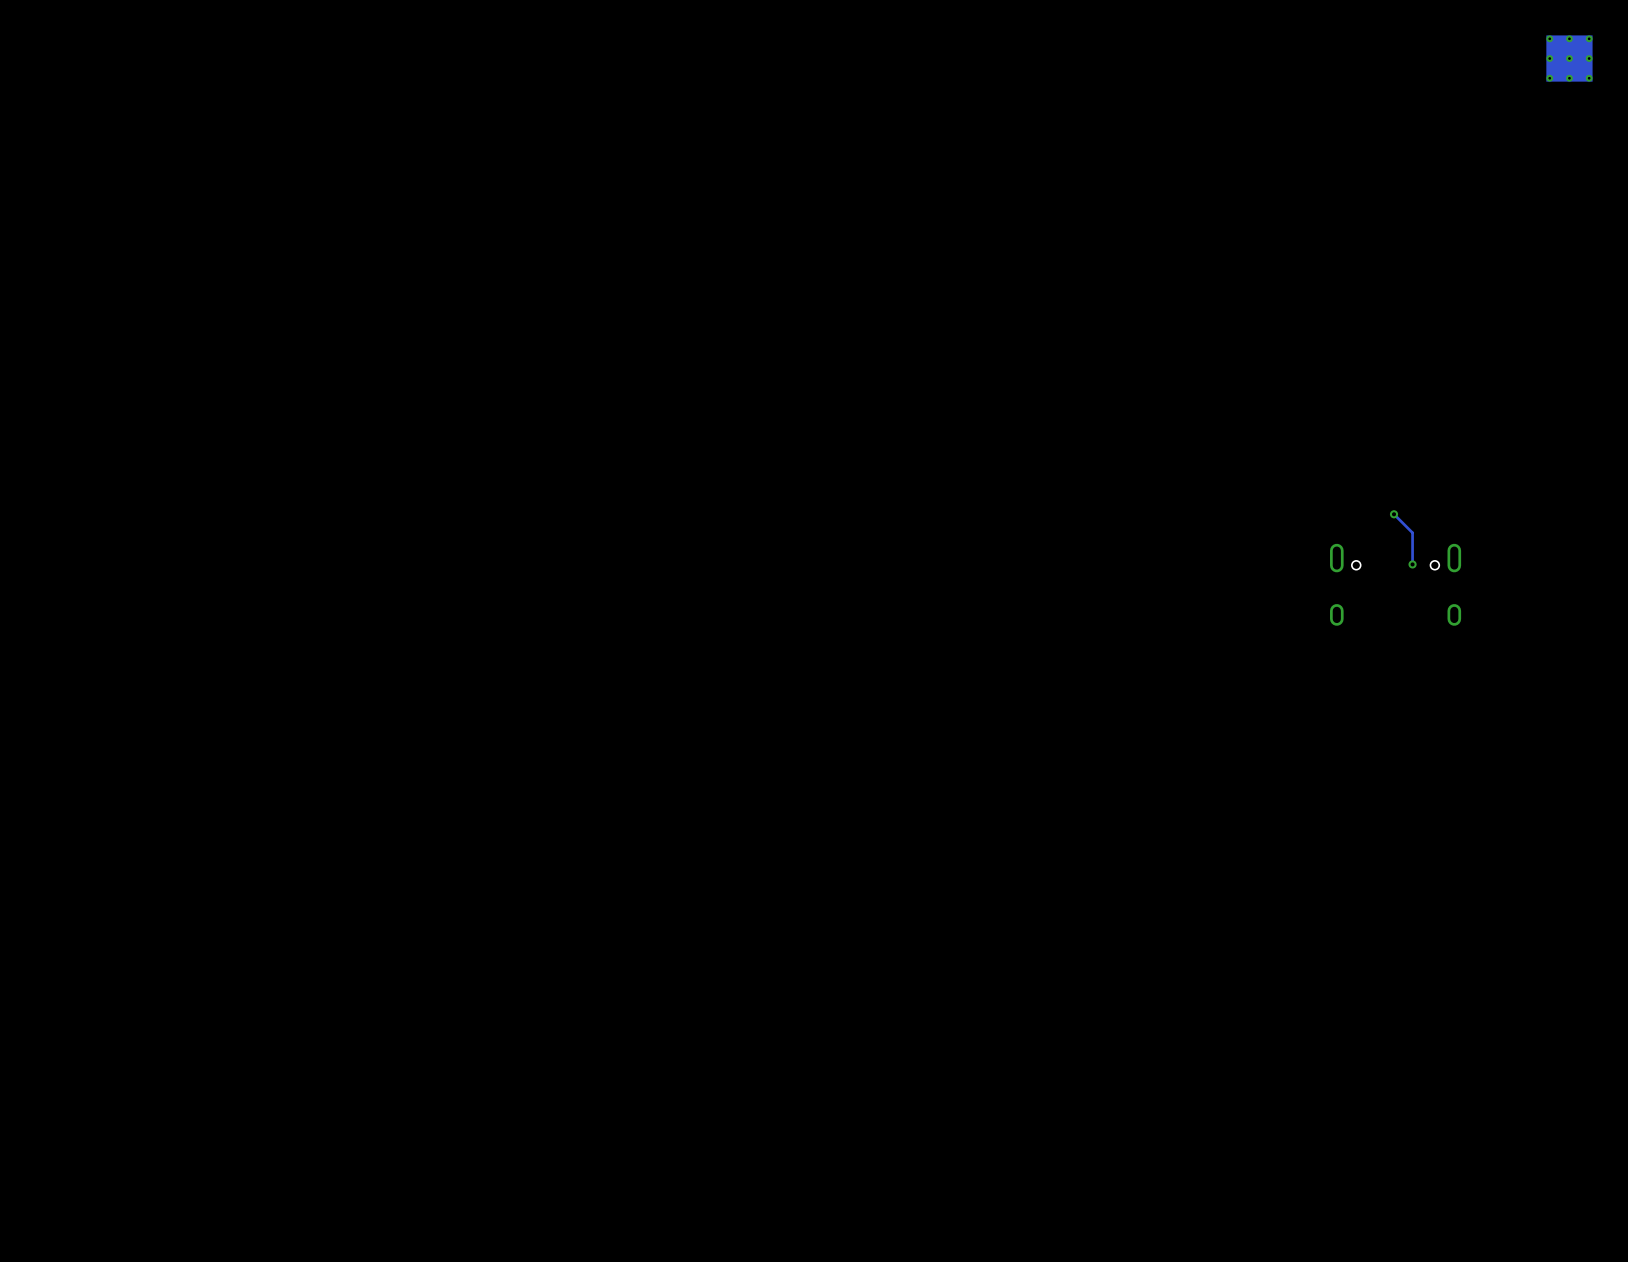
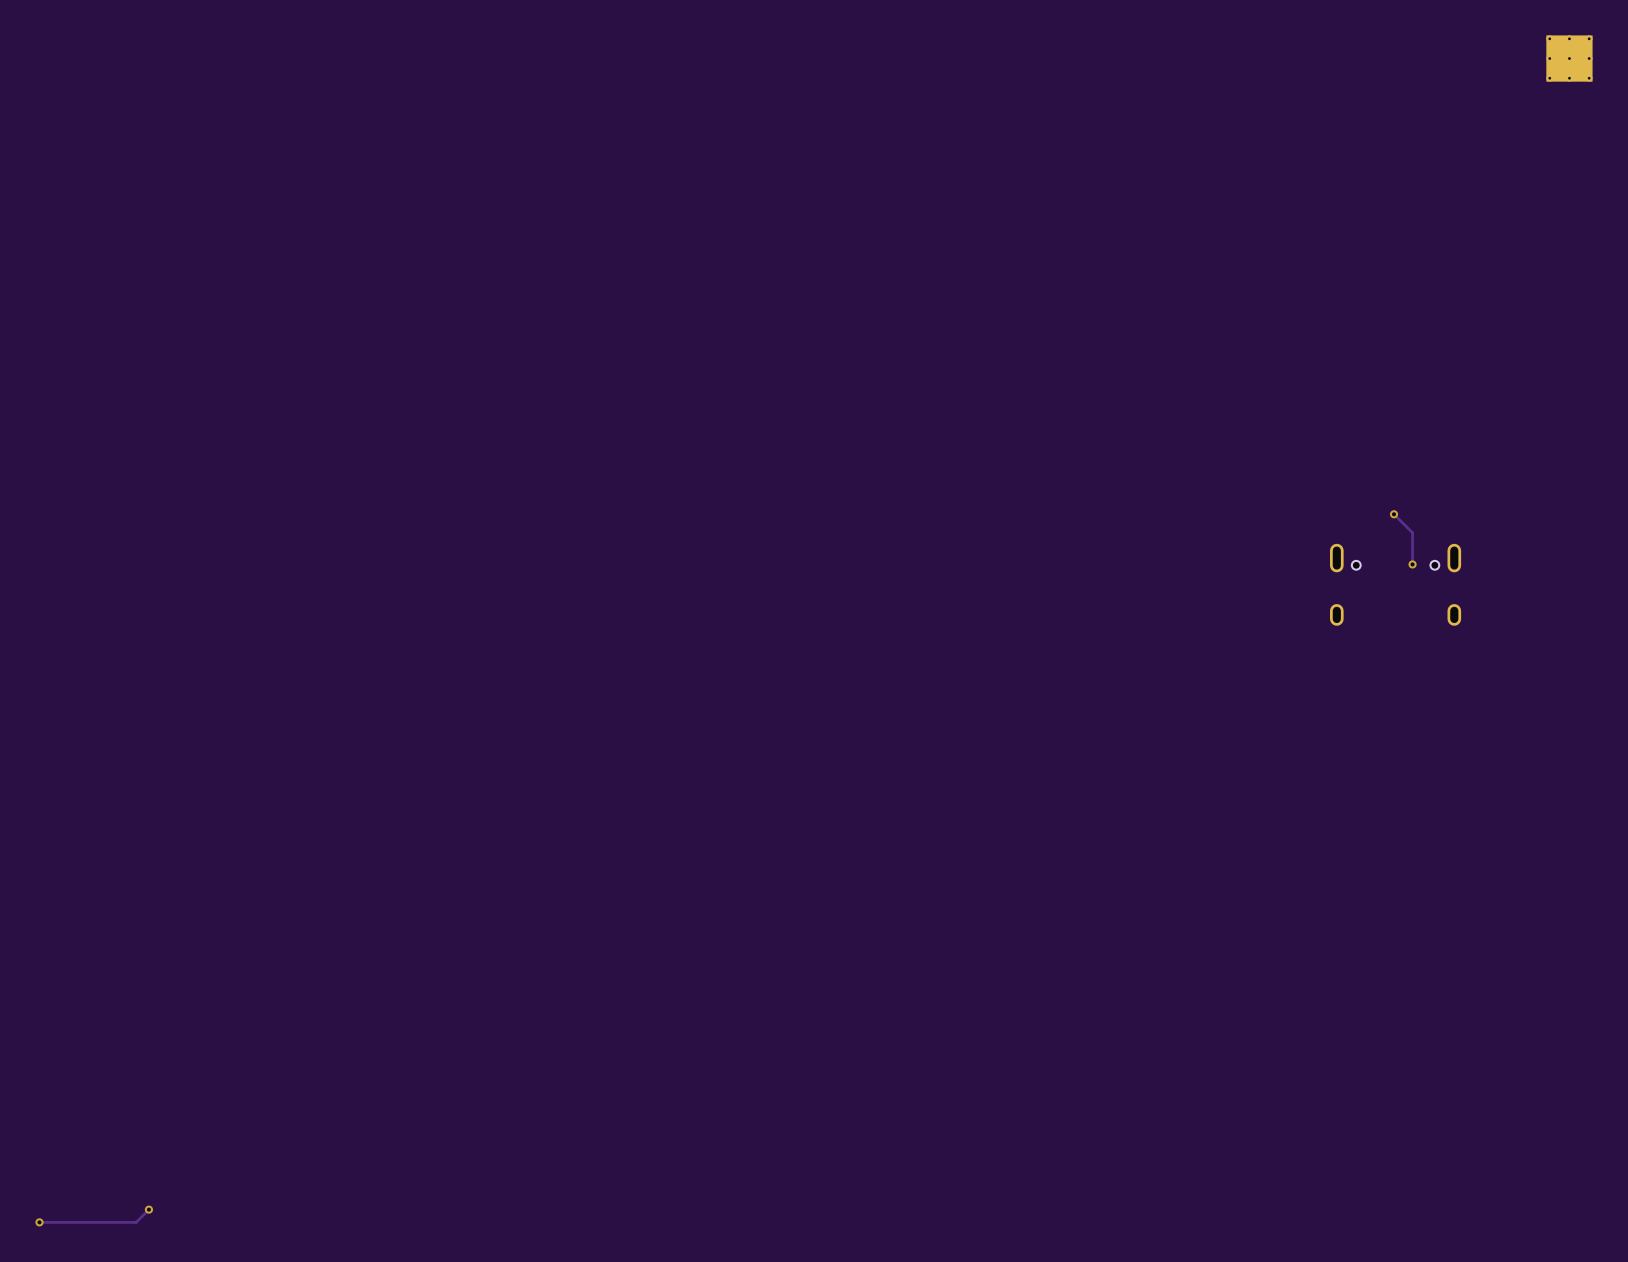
track: none -> (148, 1209) (136, 1222) (39, 1222)
via: none -> (148, 1209)
via: none -> (39, 1222)

